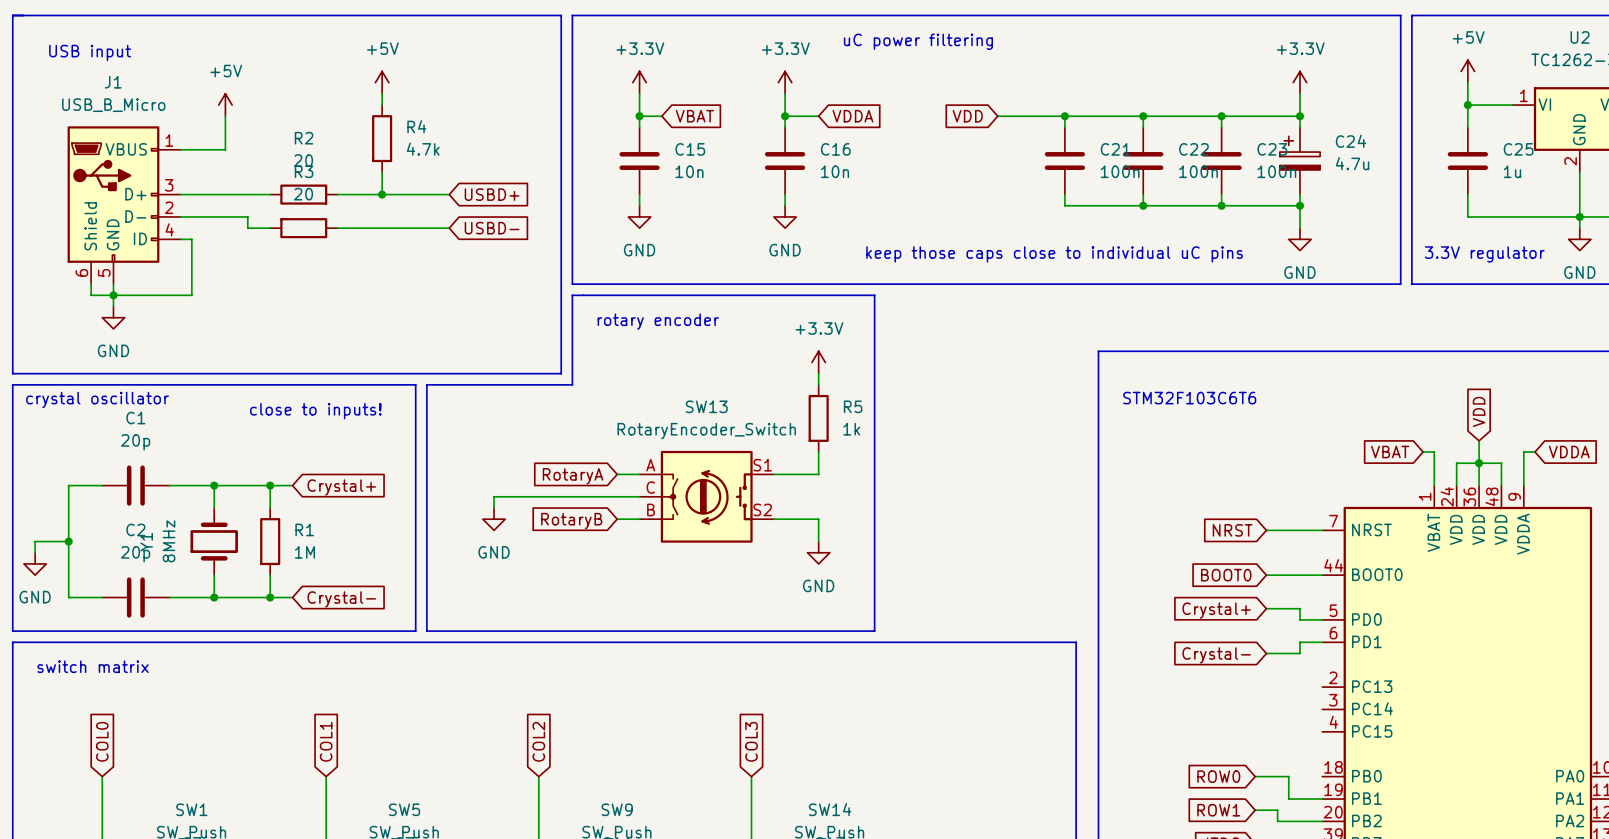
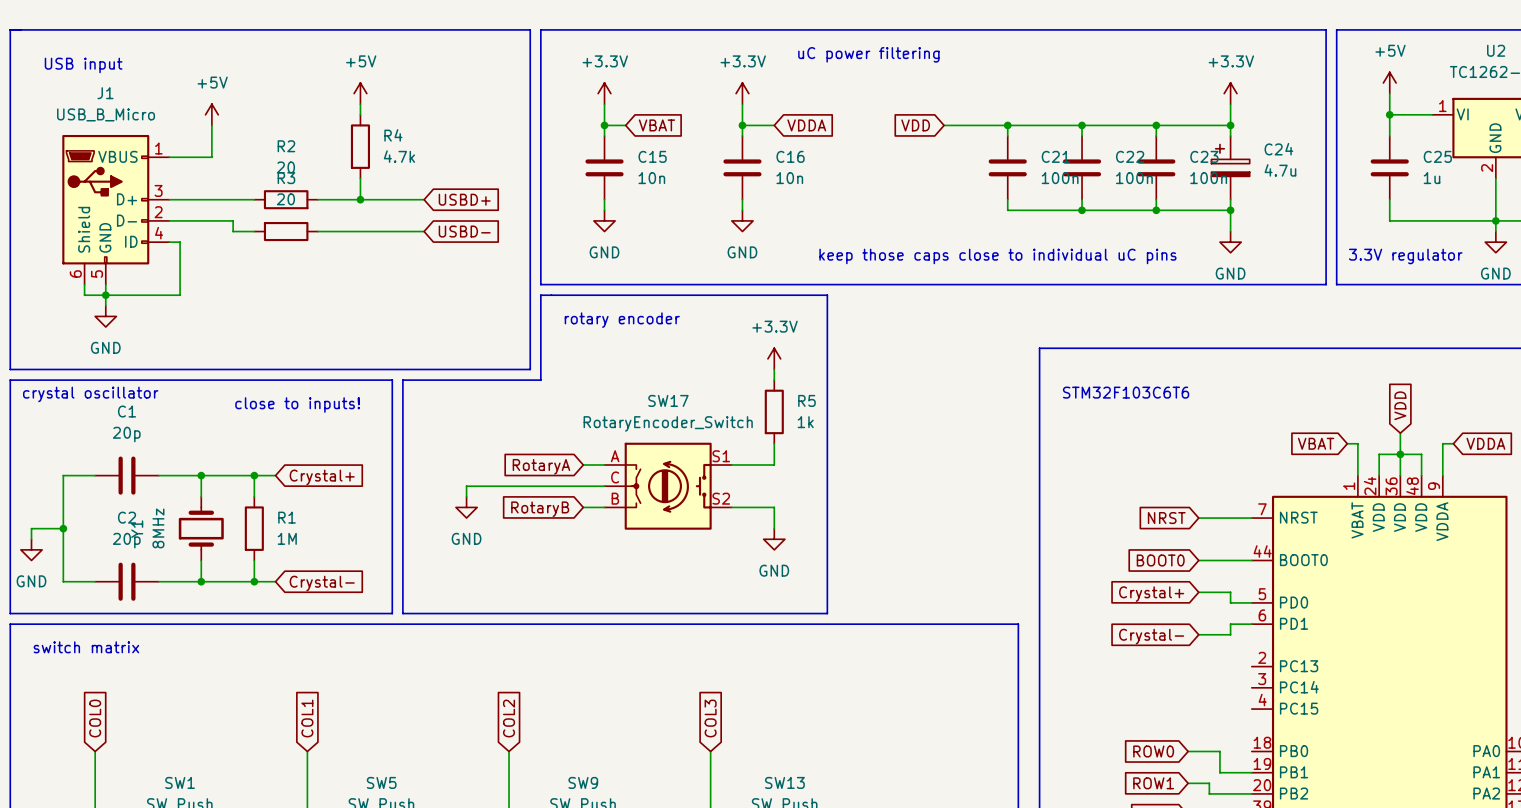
SW13 name: SW13 (706, 406) -> SW17 (668, 400)
SW14 name: SW14 (830, 809) -> SW13 (784, 782)

